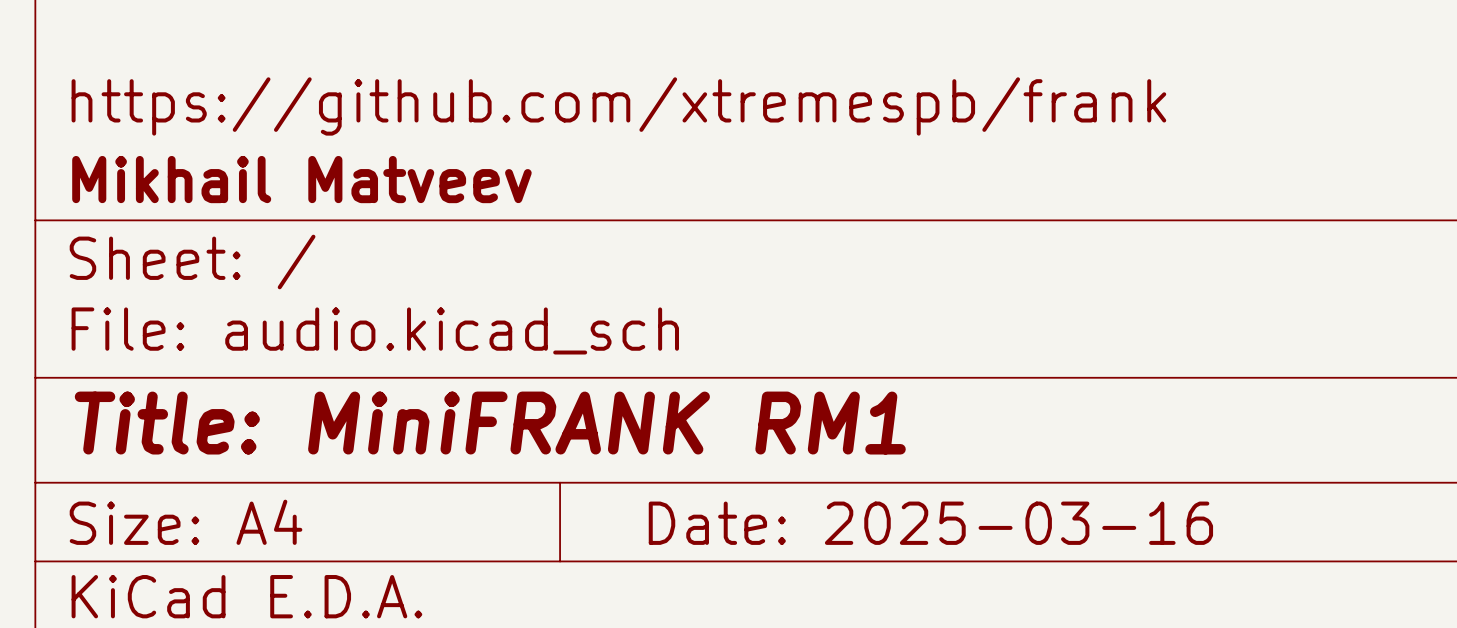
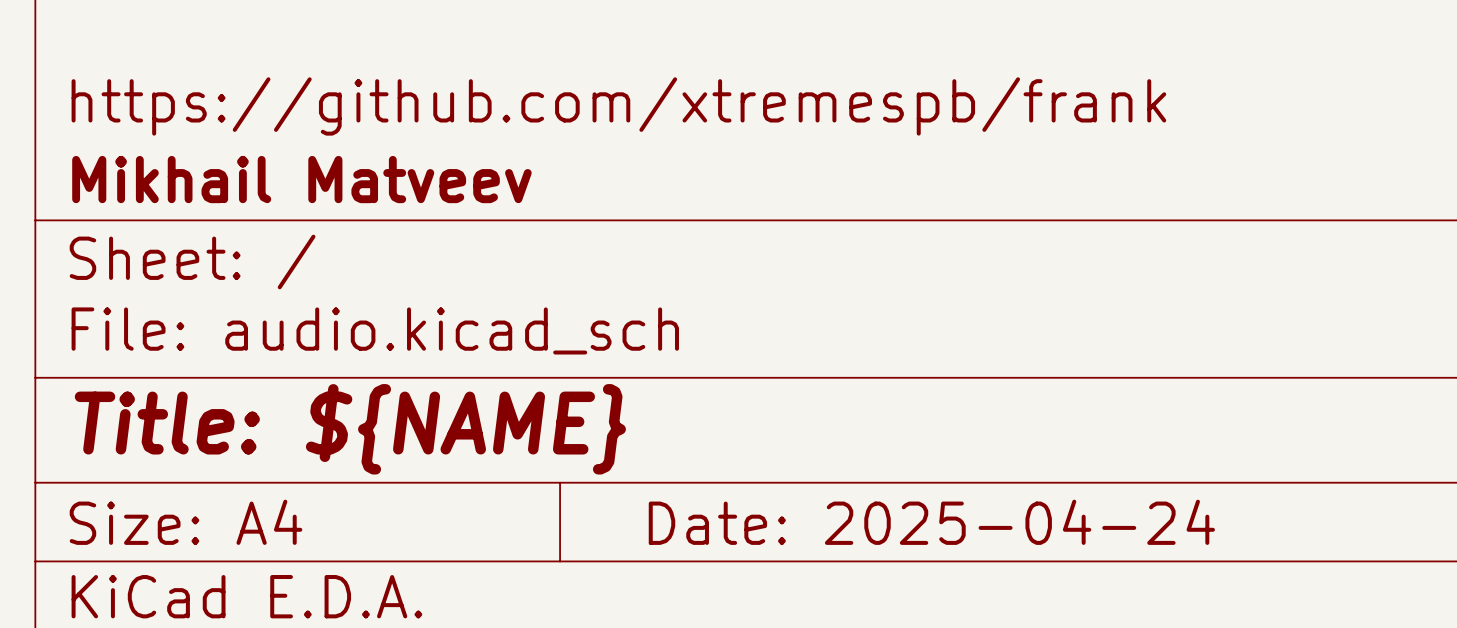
title block: Title: MiniFRANK RM1 (490, 423) -> Title: ${NAME} (350, 429)
title block: Date: 2025-03-16 (930, 523) -> Date: 2025-04-24 (931, 522)

